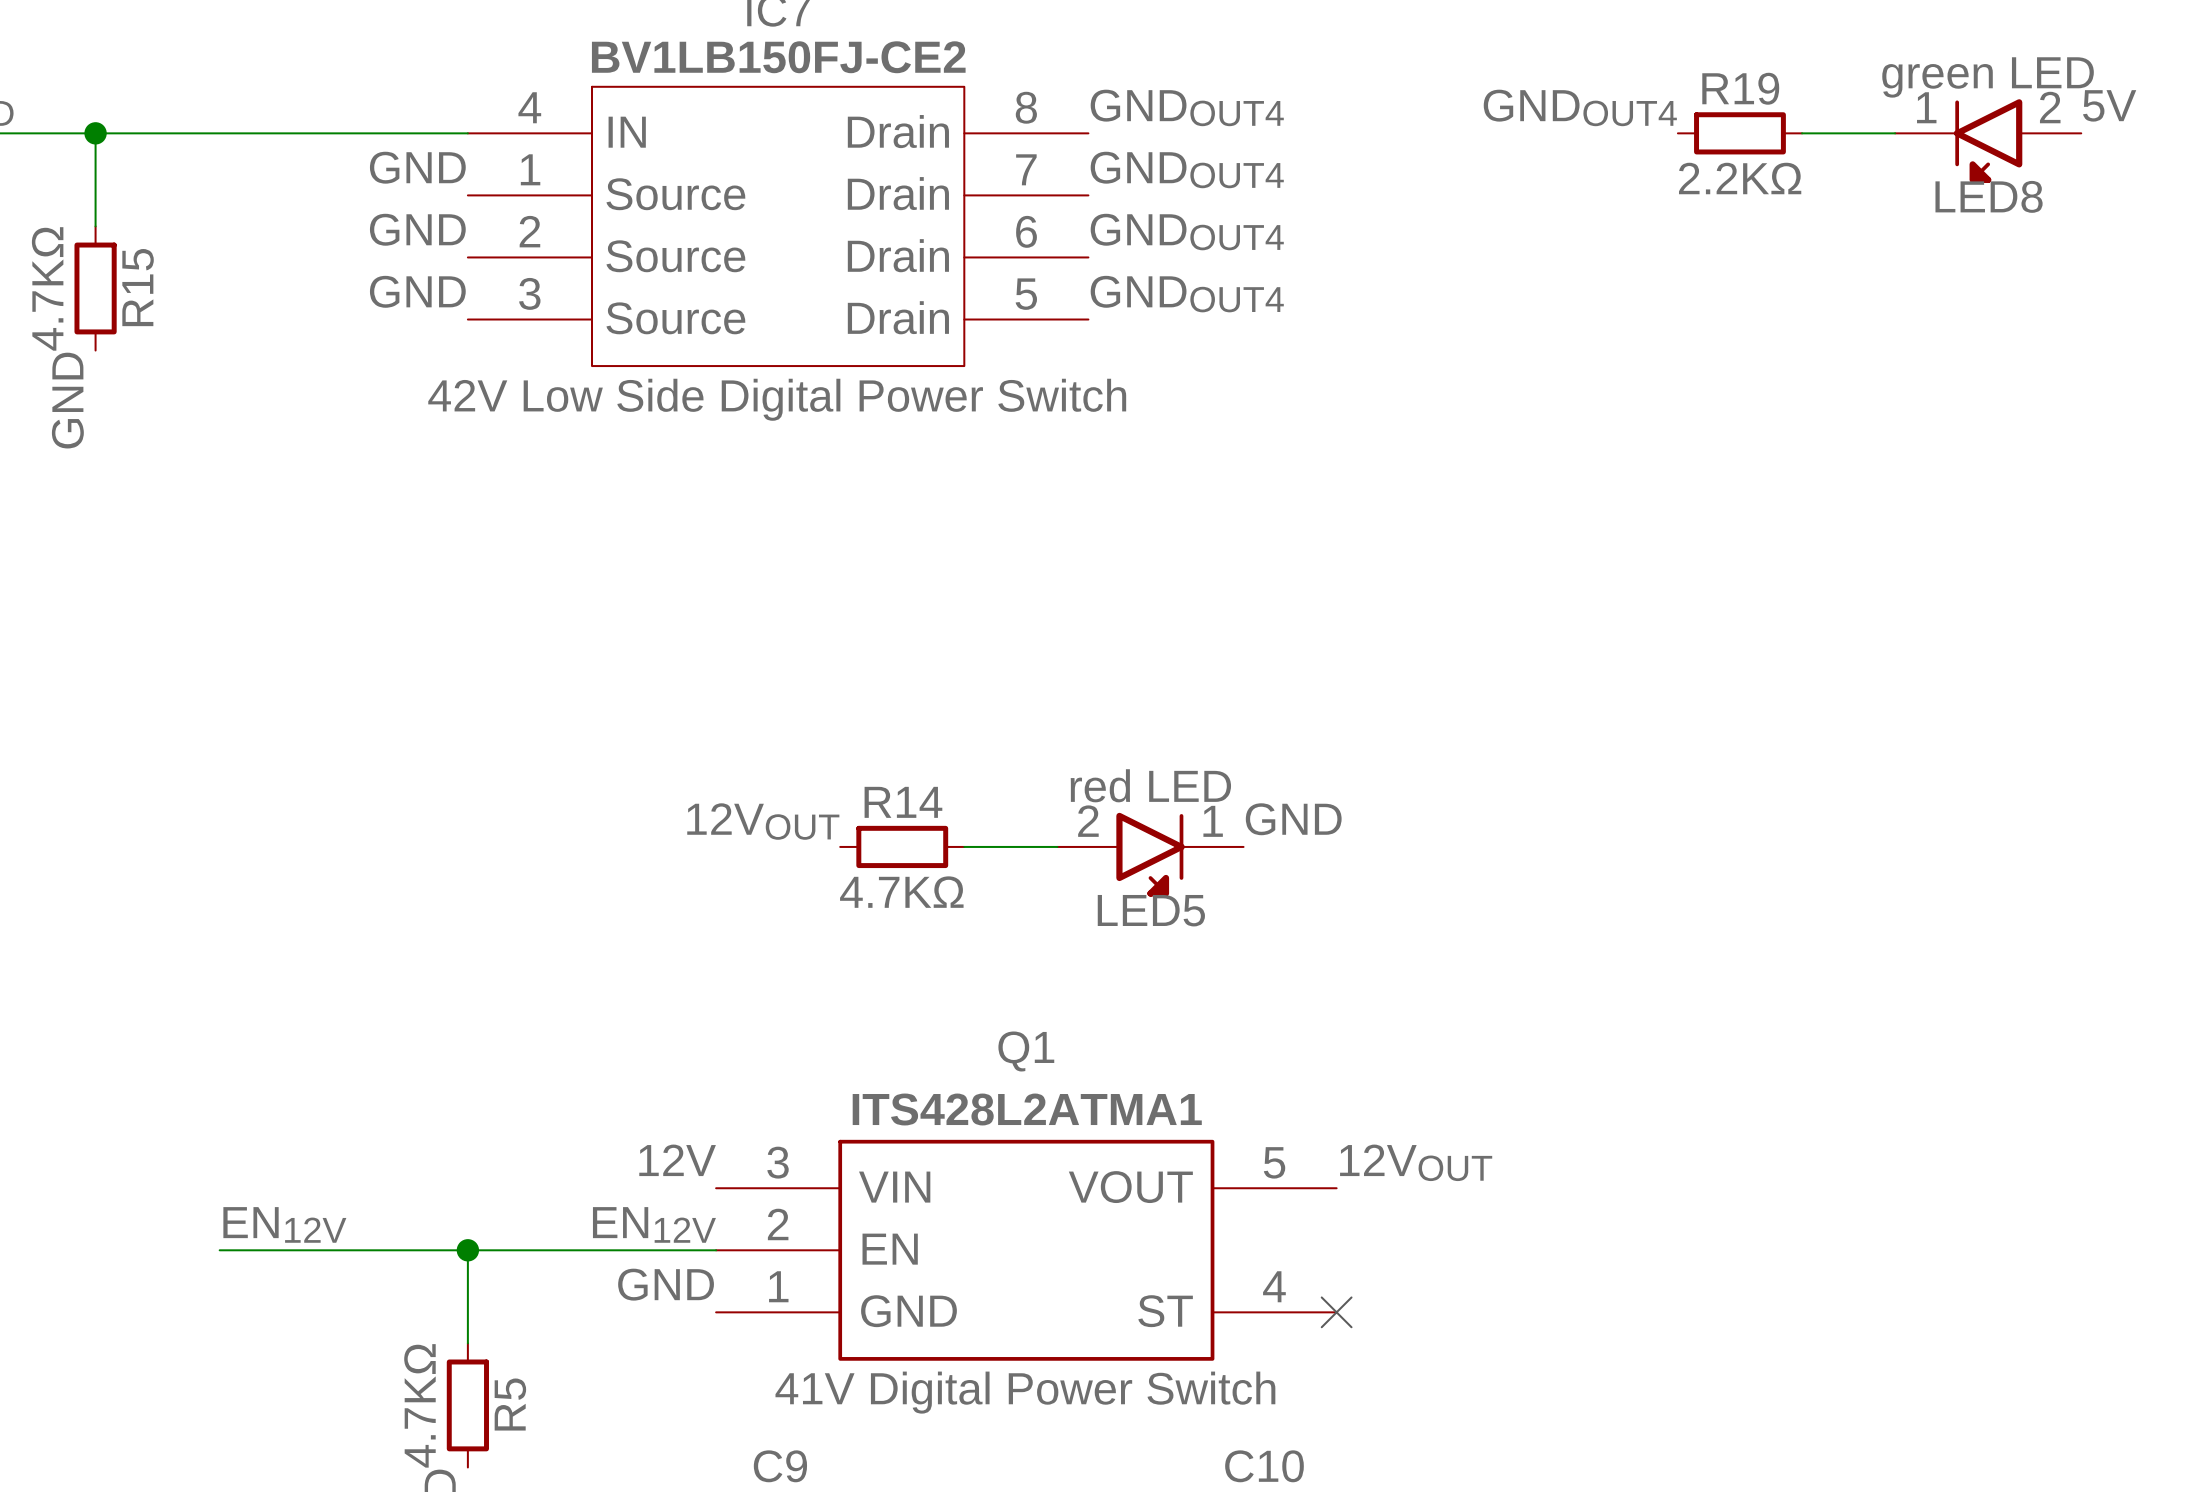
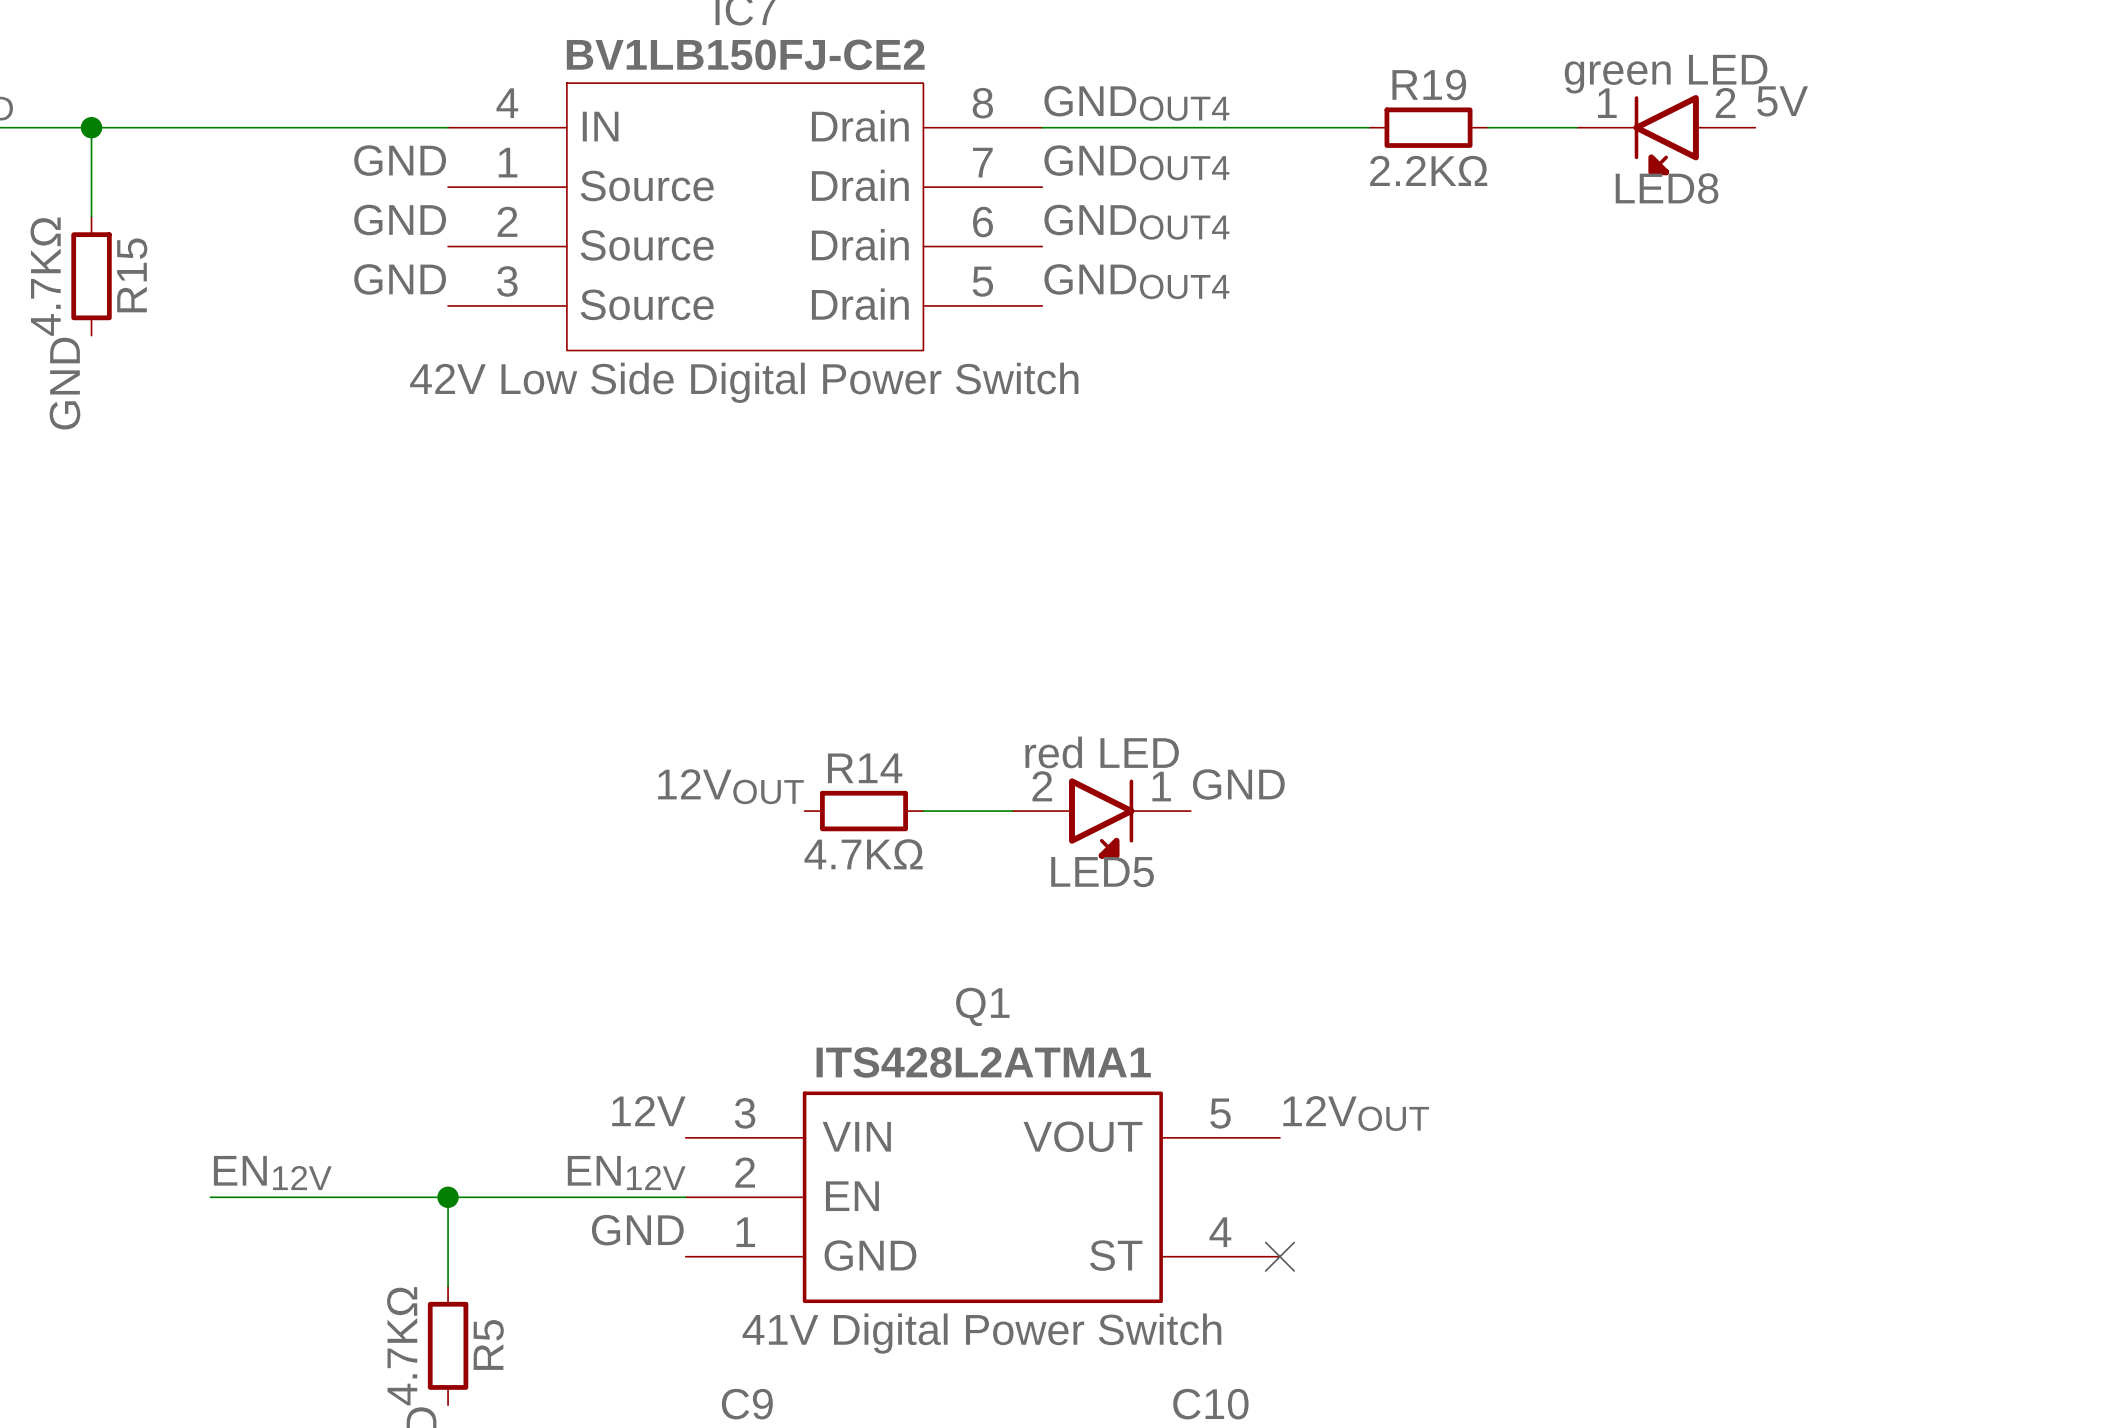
label position: 5V (2109, 105) -> 5V (1782, 101)
label: GNDOUT4 (1580, 107) -> none
wire: none -> (1042, 127) (1369, 127)
R19 position: (1739, 133) -> (1428, 127)
wire: (1802, 133) (1895, 133) -> (1487, 127) (1577, 127)
LED8 position: (1988, 141) -> (1666, 135)

